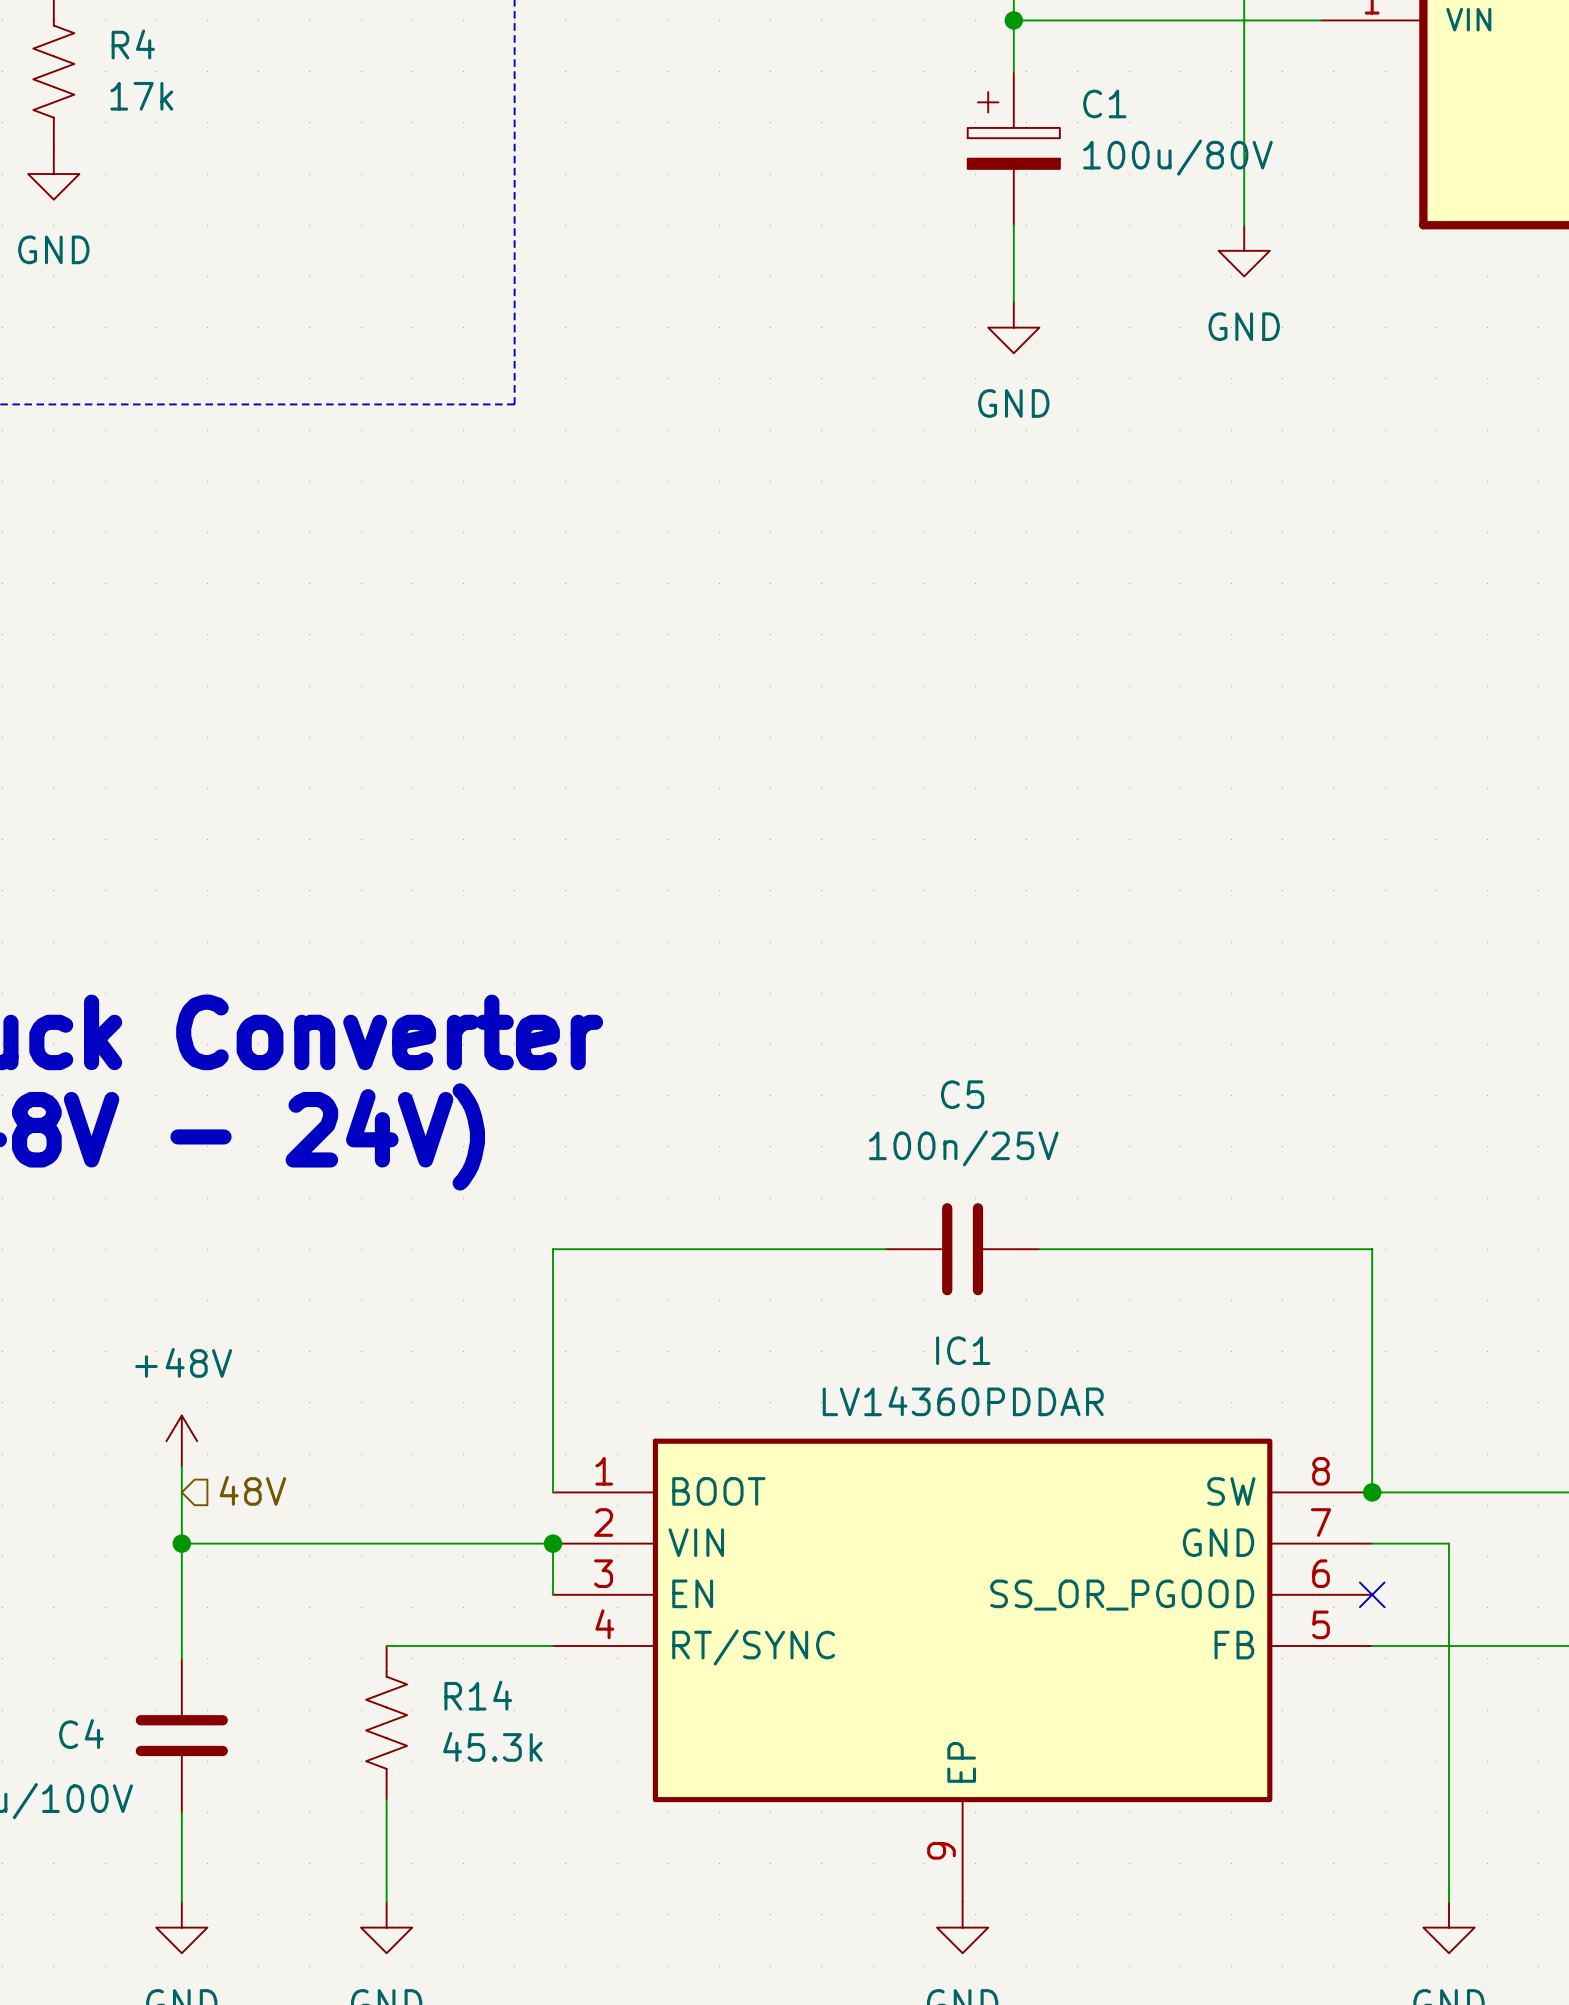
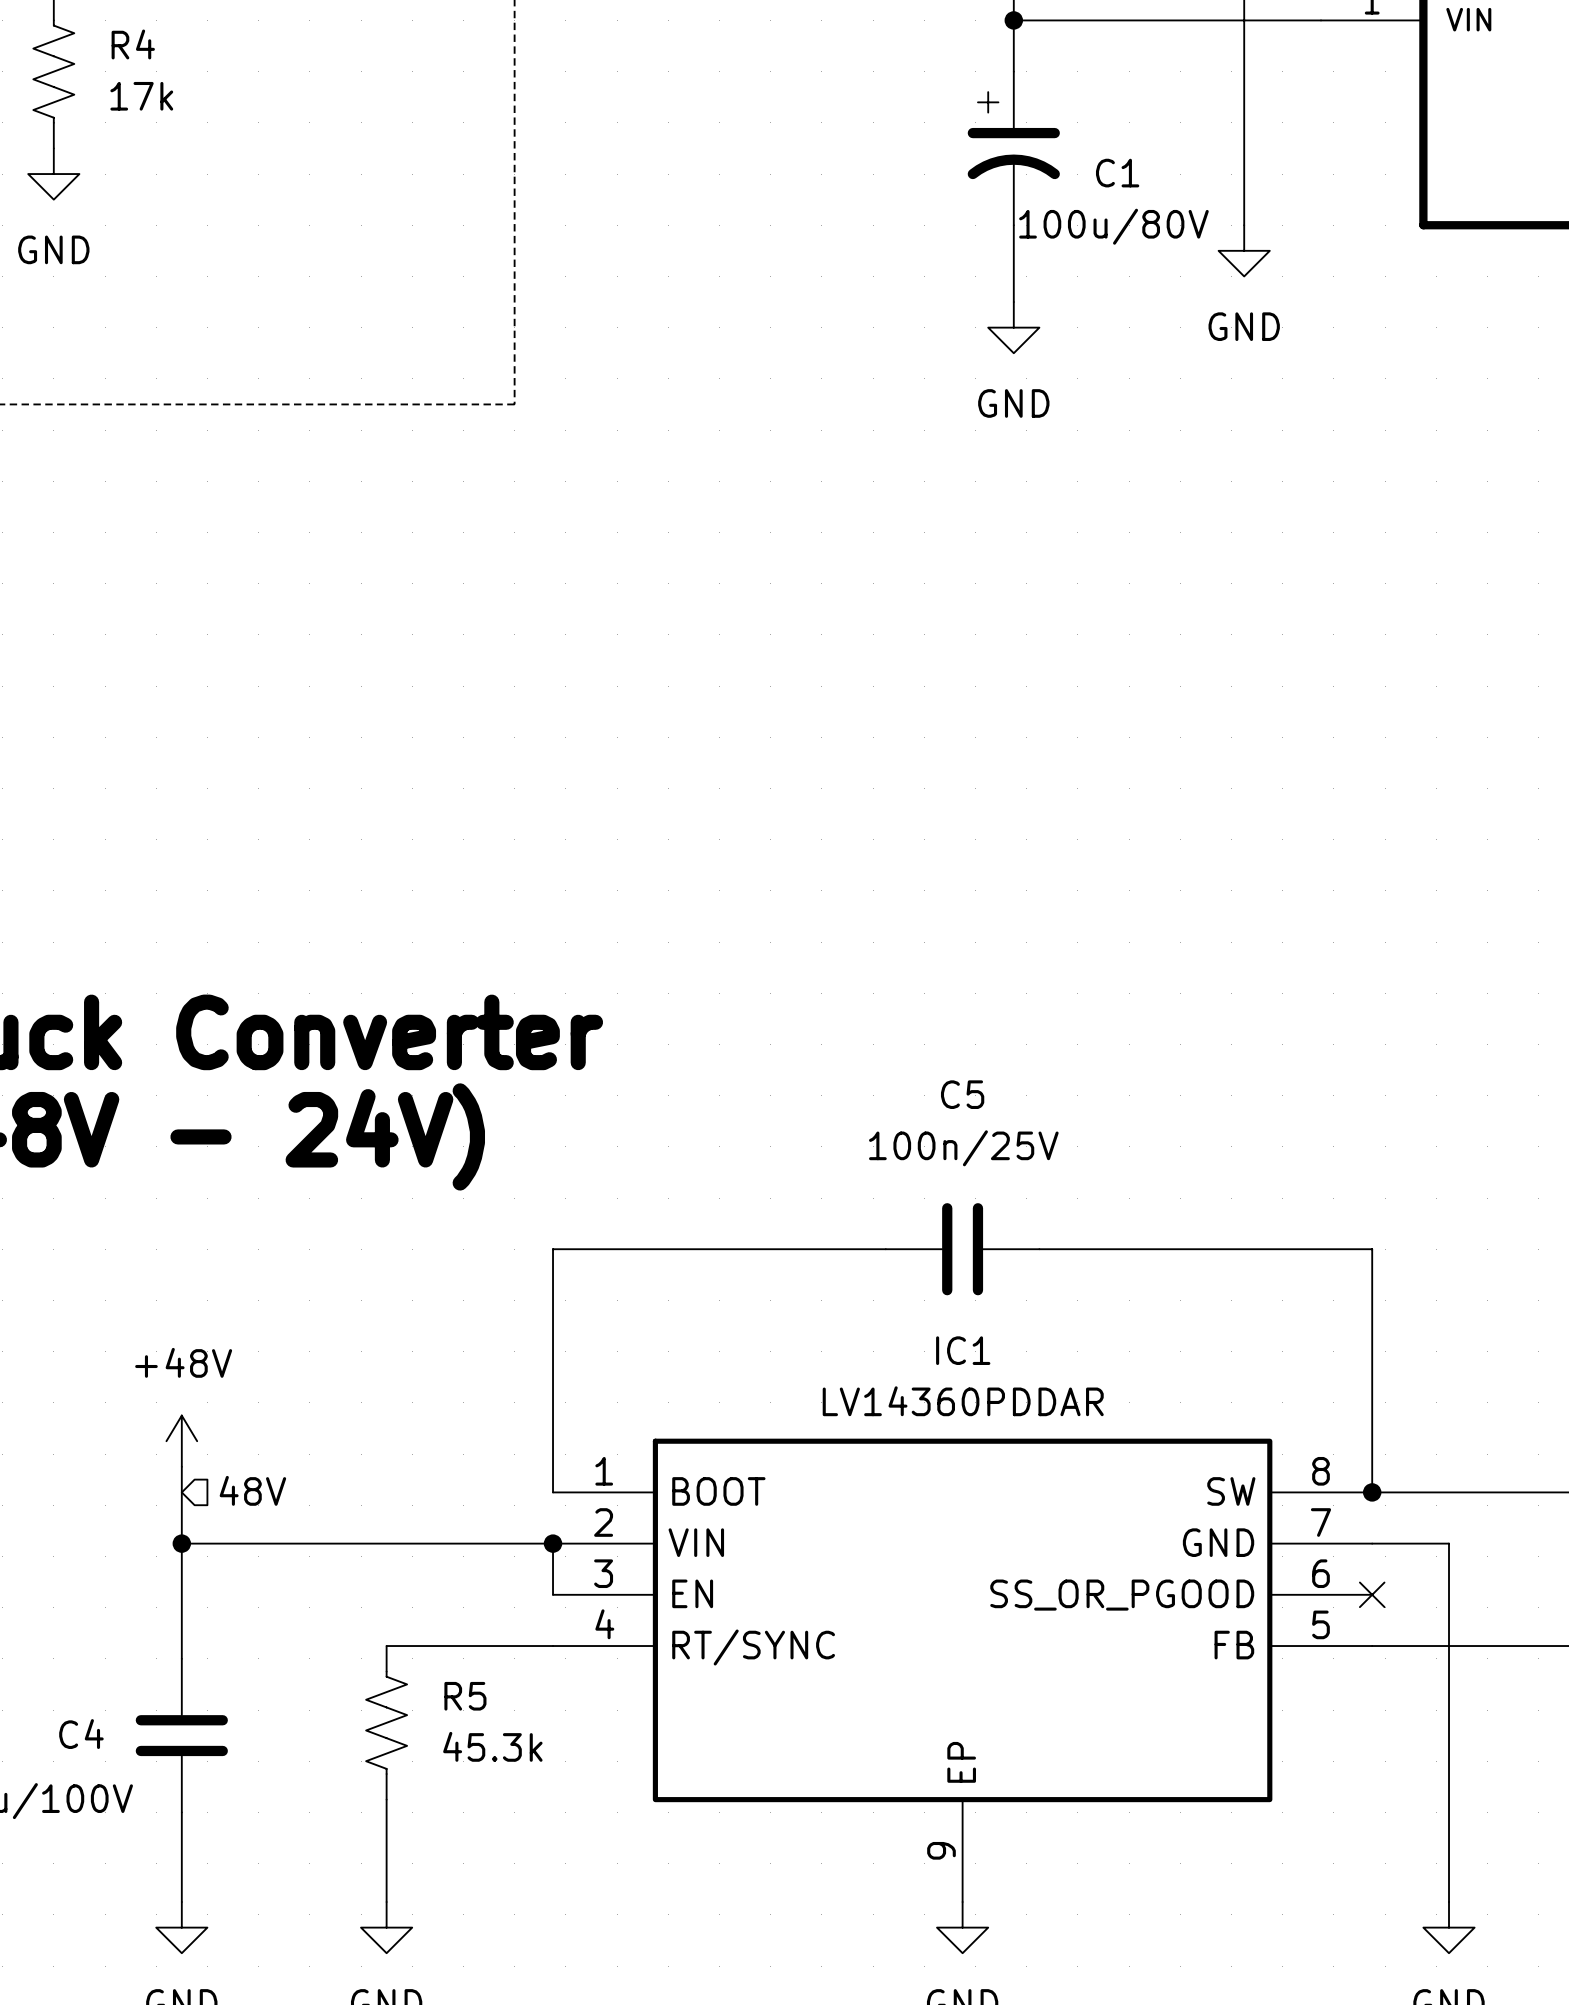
C1 symbol: [967, 71, 1060, 226] -> [967, 71, 1060, 226]
C1 name position: C1 (1104, 103) -> C1 (1117, 173)
C1 value position: 100u/80V (1177, 157) -> 100u/80V (1113, 226)
R14 name: R14 (478, 1695) -> R5 (465, 1696)

